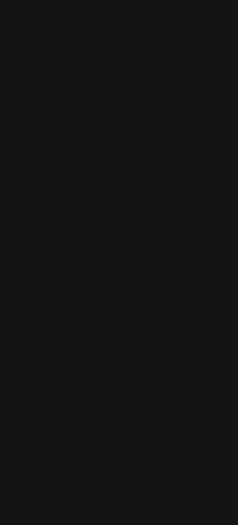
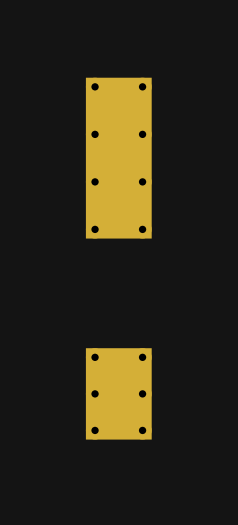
part: none -> (118, 158)
part: none -> (118, 393)

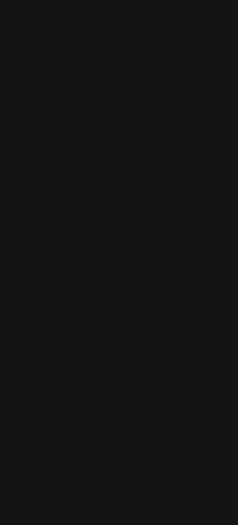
part: (118, 158) -> none
part: (118, 393) -> none

